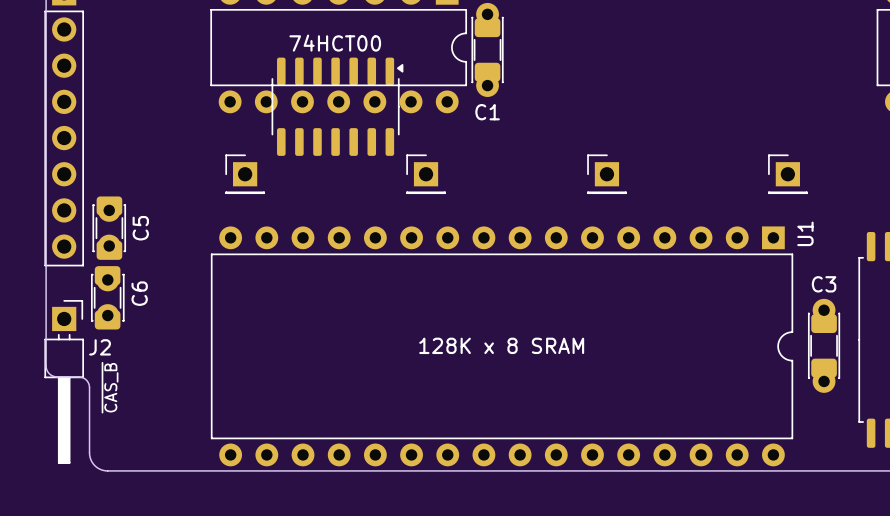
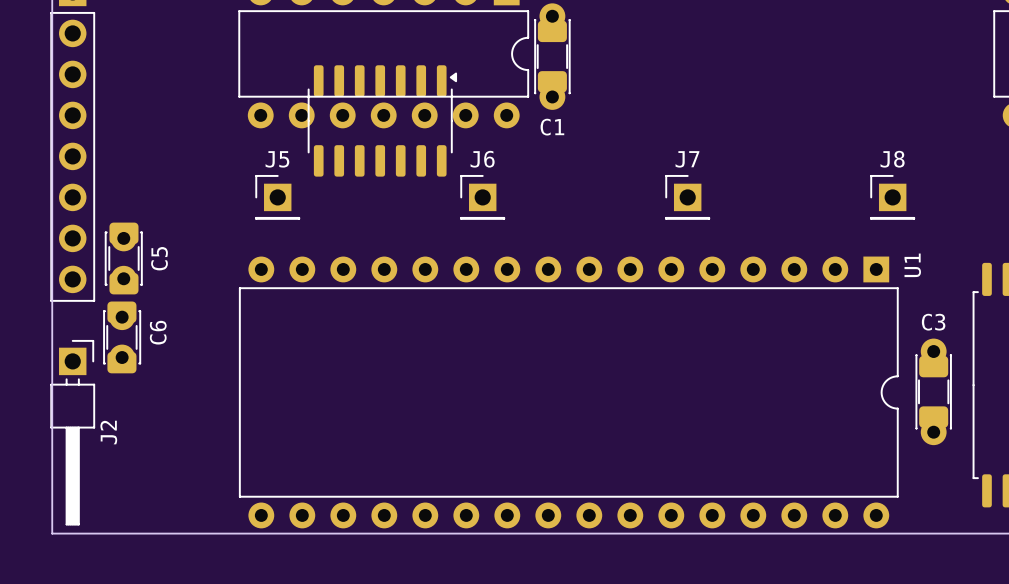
part value: 74HCT00 (335, 43) -> none
J5 name: none -> J5 (277, 159)
J6 name: none -> J6 (482, 159)
J7 name: none -> J7 (687, 159)
J8 name: none -> J8 (892, 159)
U1 value: 128K x 8 SRAM (501, 345) -> none
J2 name rotation: 0° (100, 347) -> 90° counterclockwise (108, 432)
J2 name position: J2 (100, 347) -> J2 (108, 432)
board edge: (46, 366) (47, 371) (52, 376) (80, 376) (88, 382) (89, 456) (96, 467) (107, 470) -> (52, 414) (52, 533) (121, 533)
J2 value: ~{CAS_B} (110, 387) -> none

